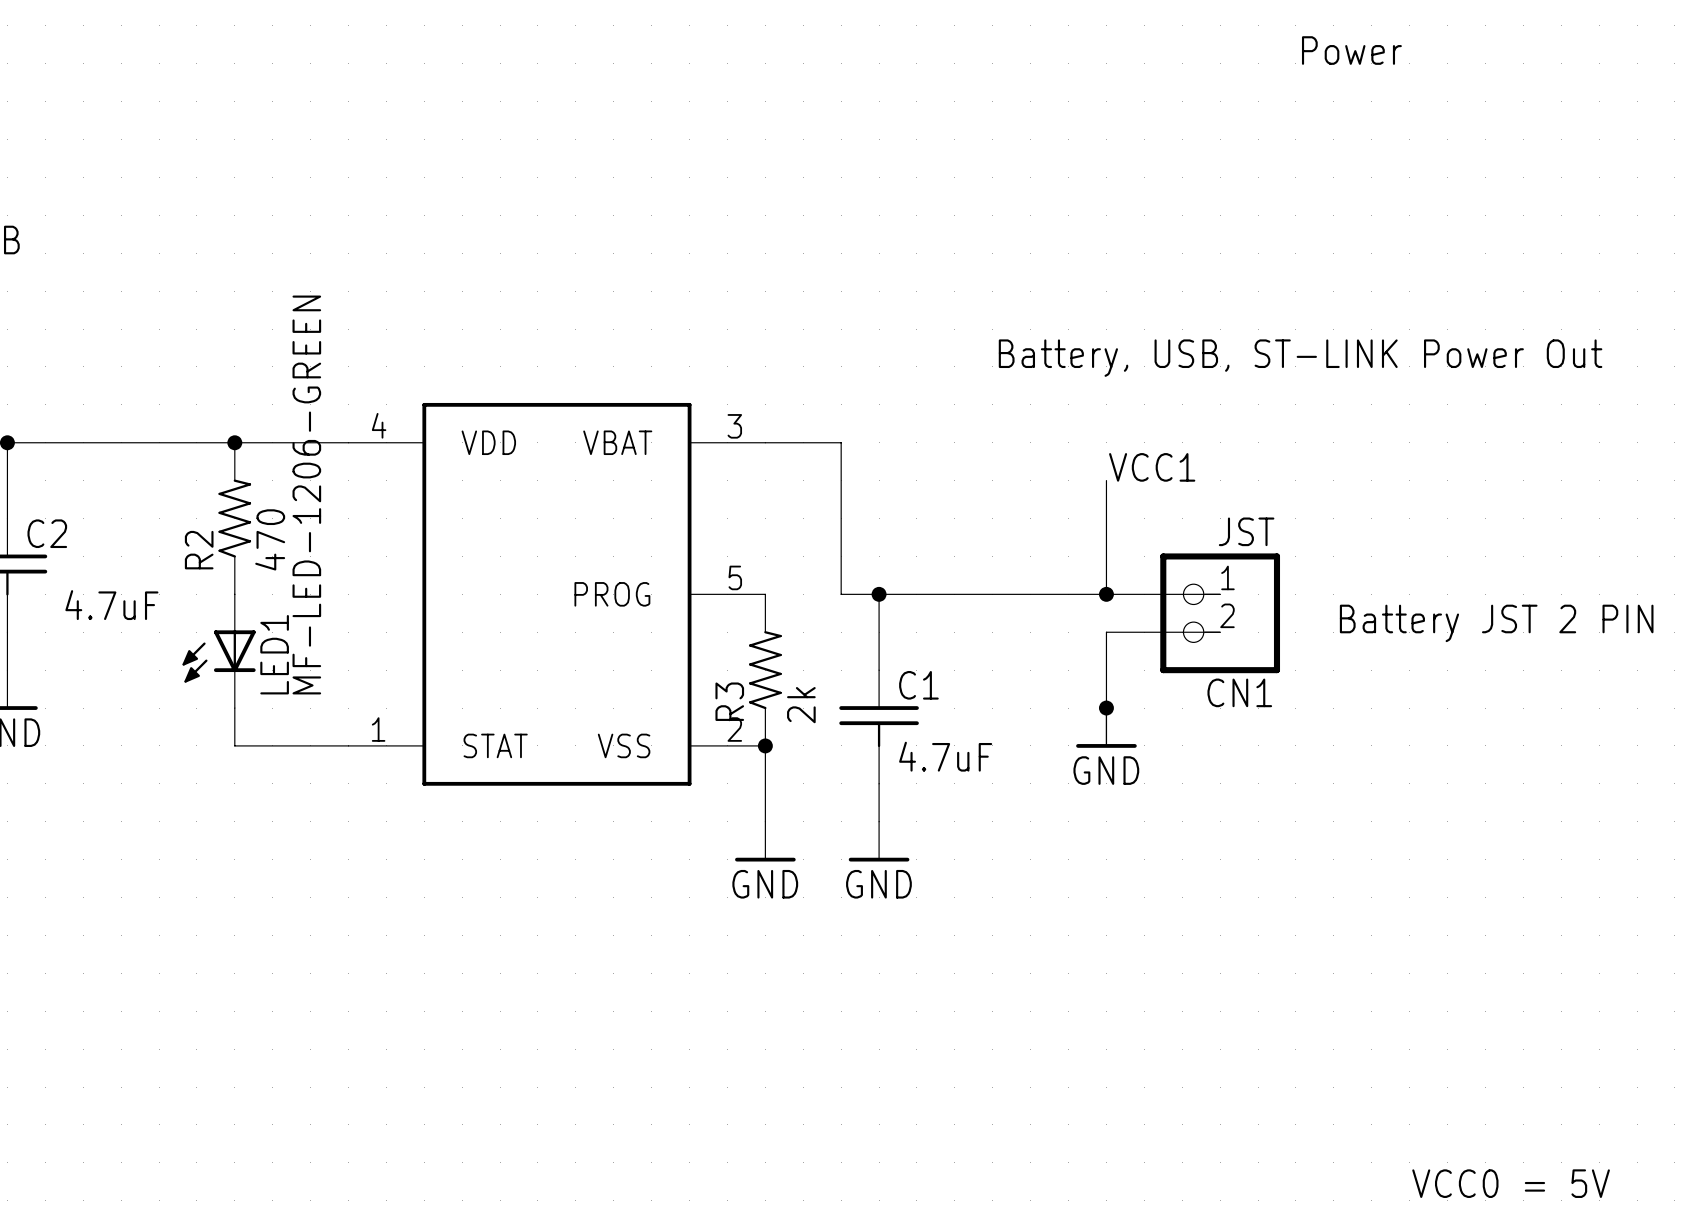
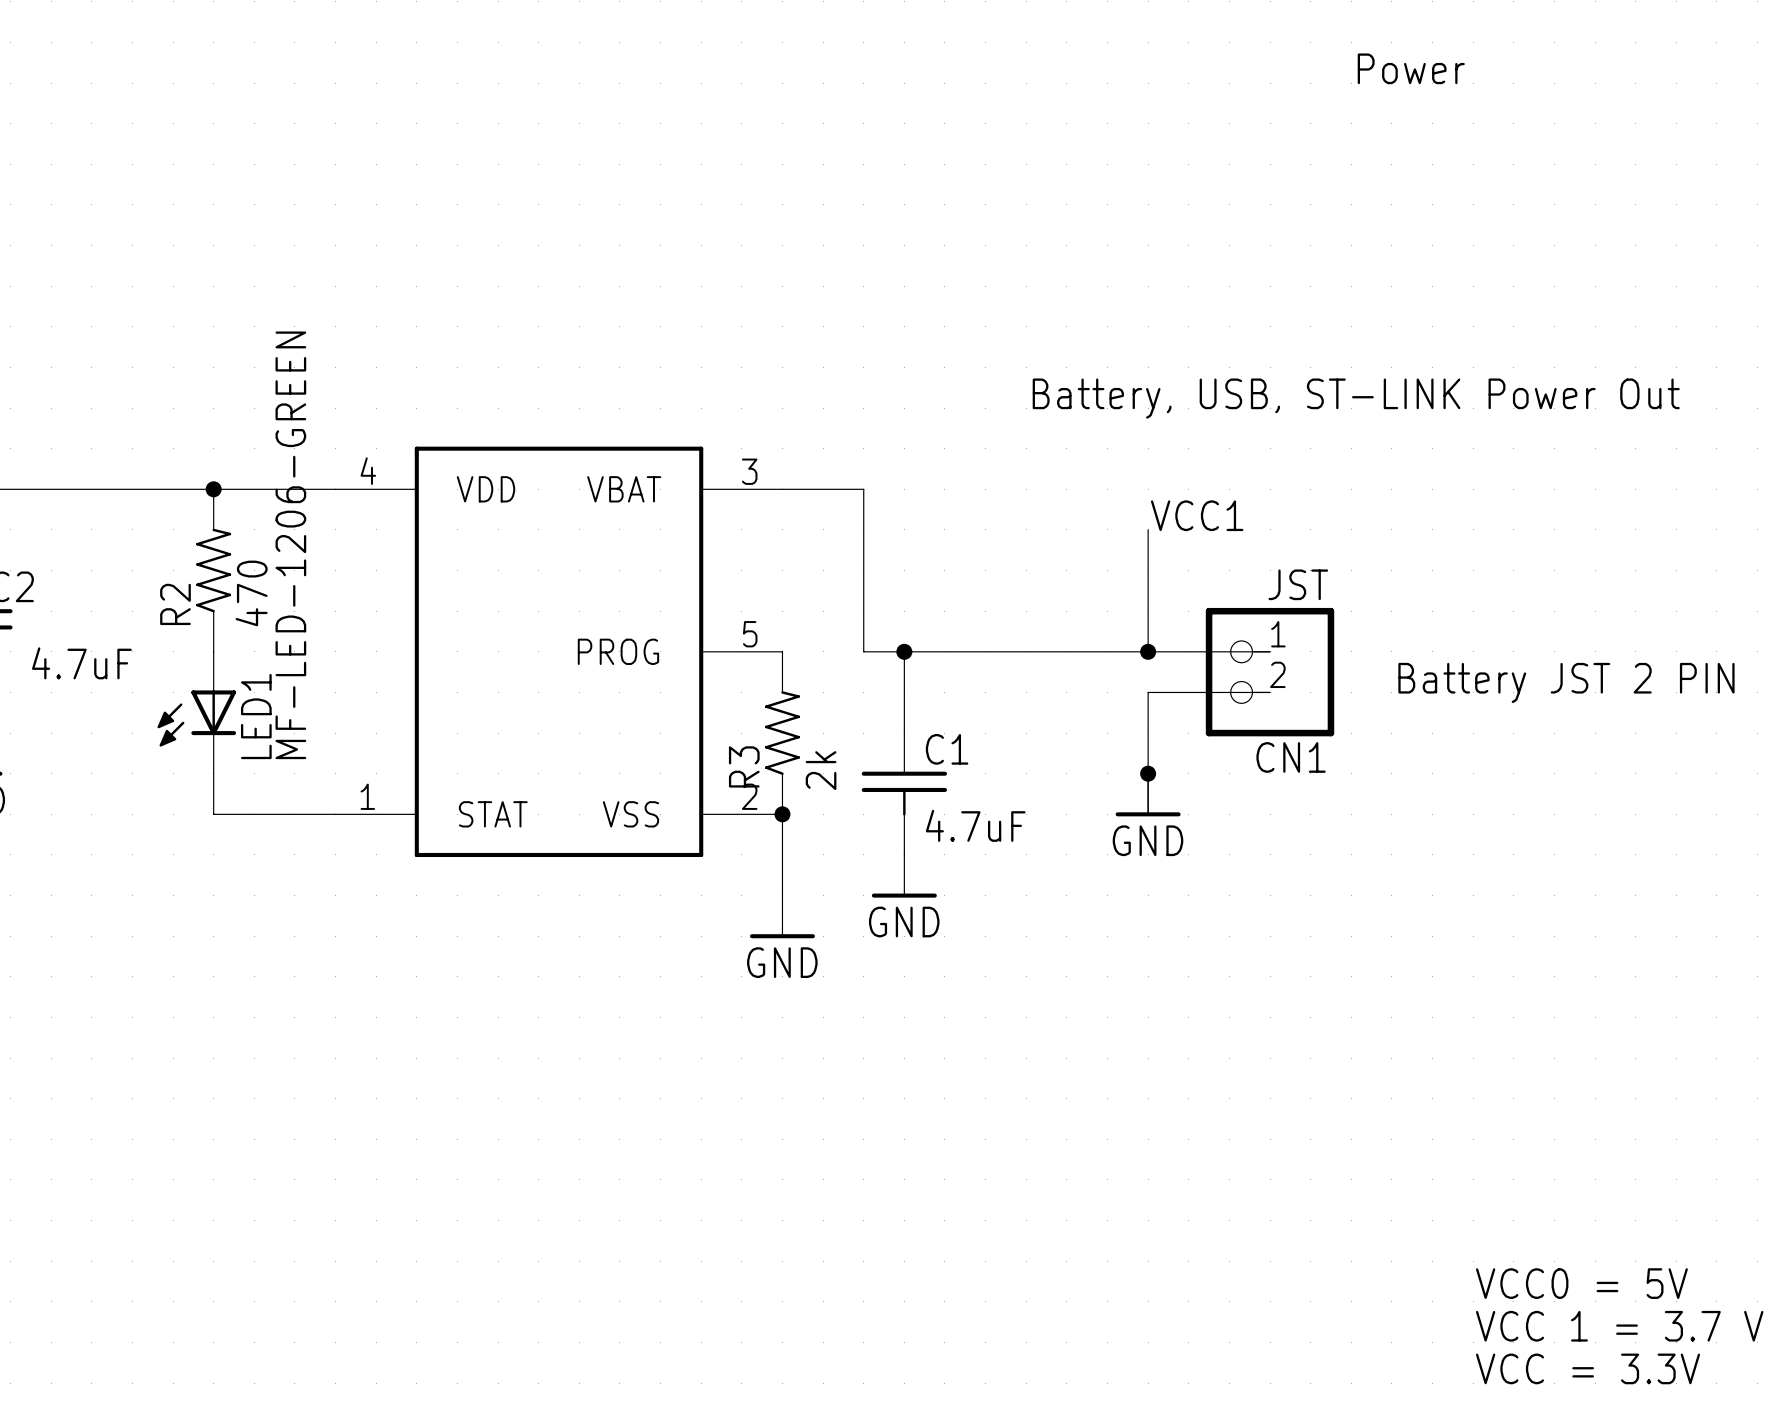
power symbol position: GND (879, 841) -> GND (904, 876)

